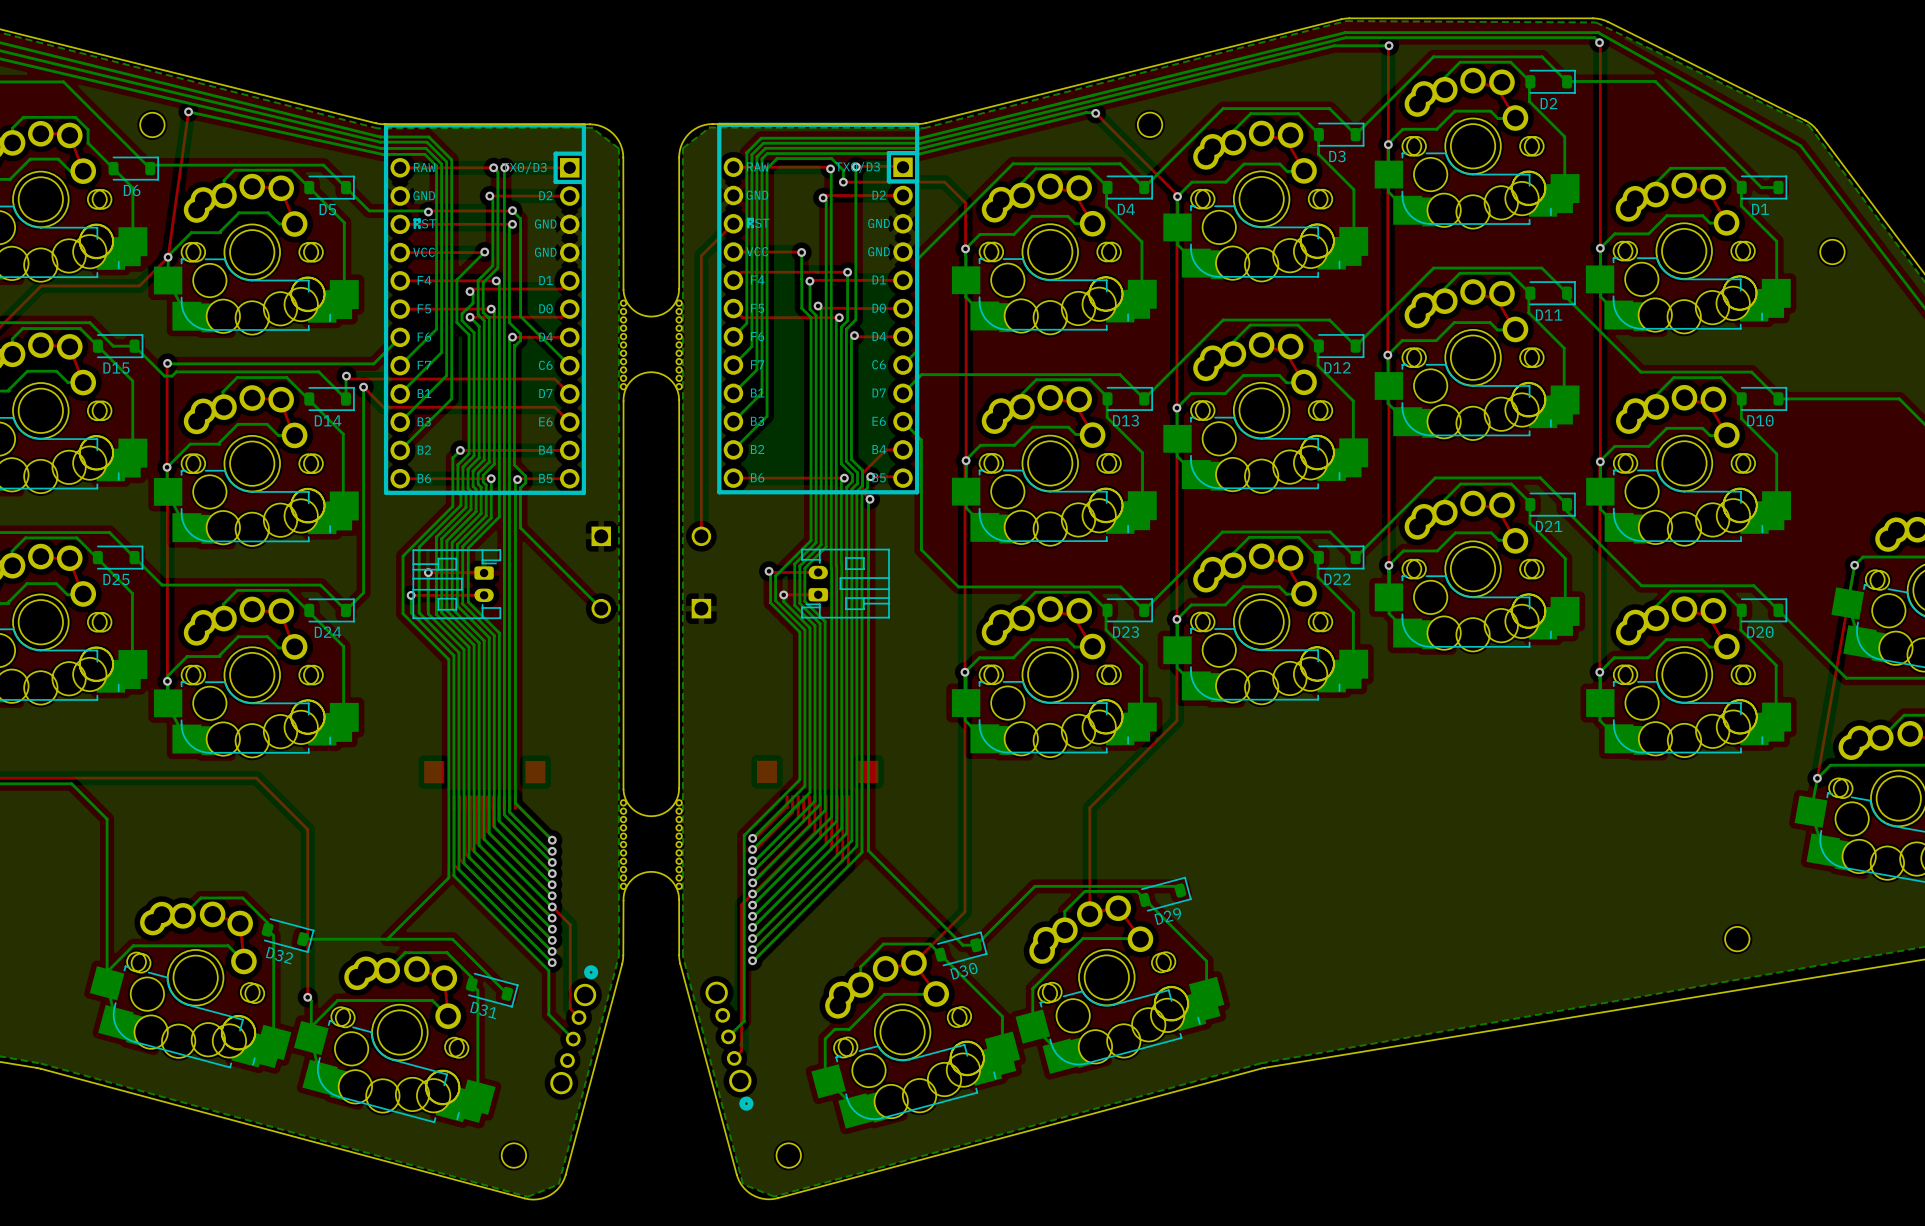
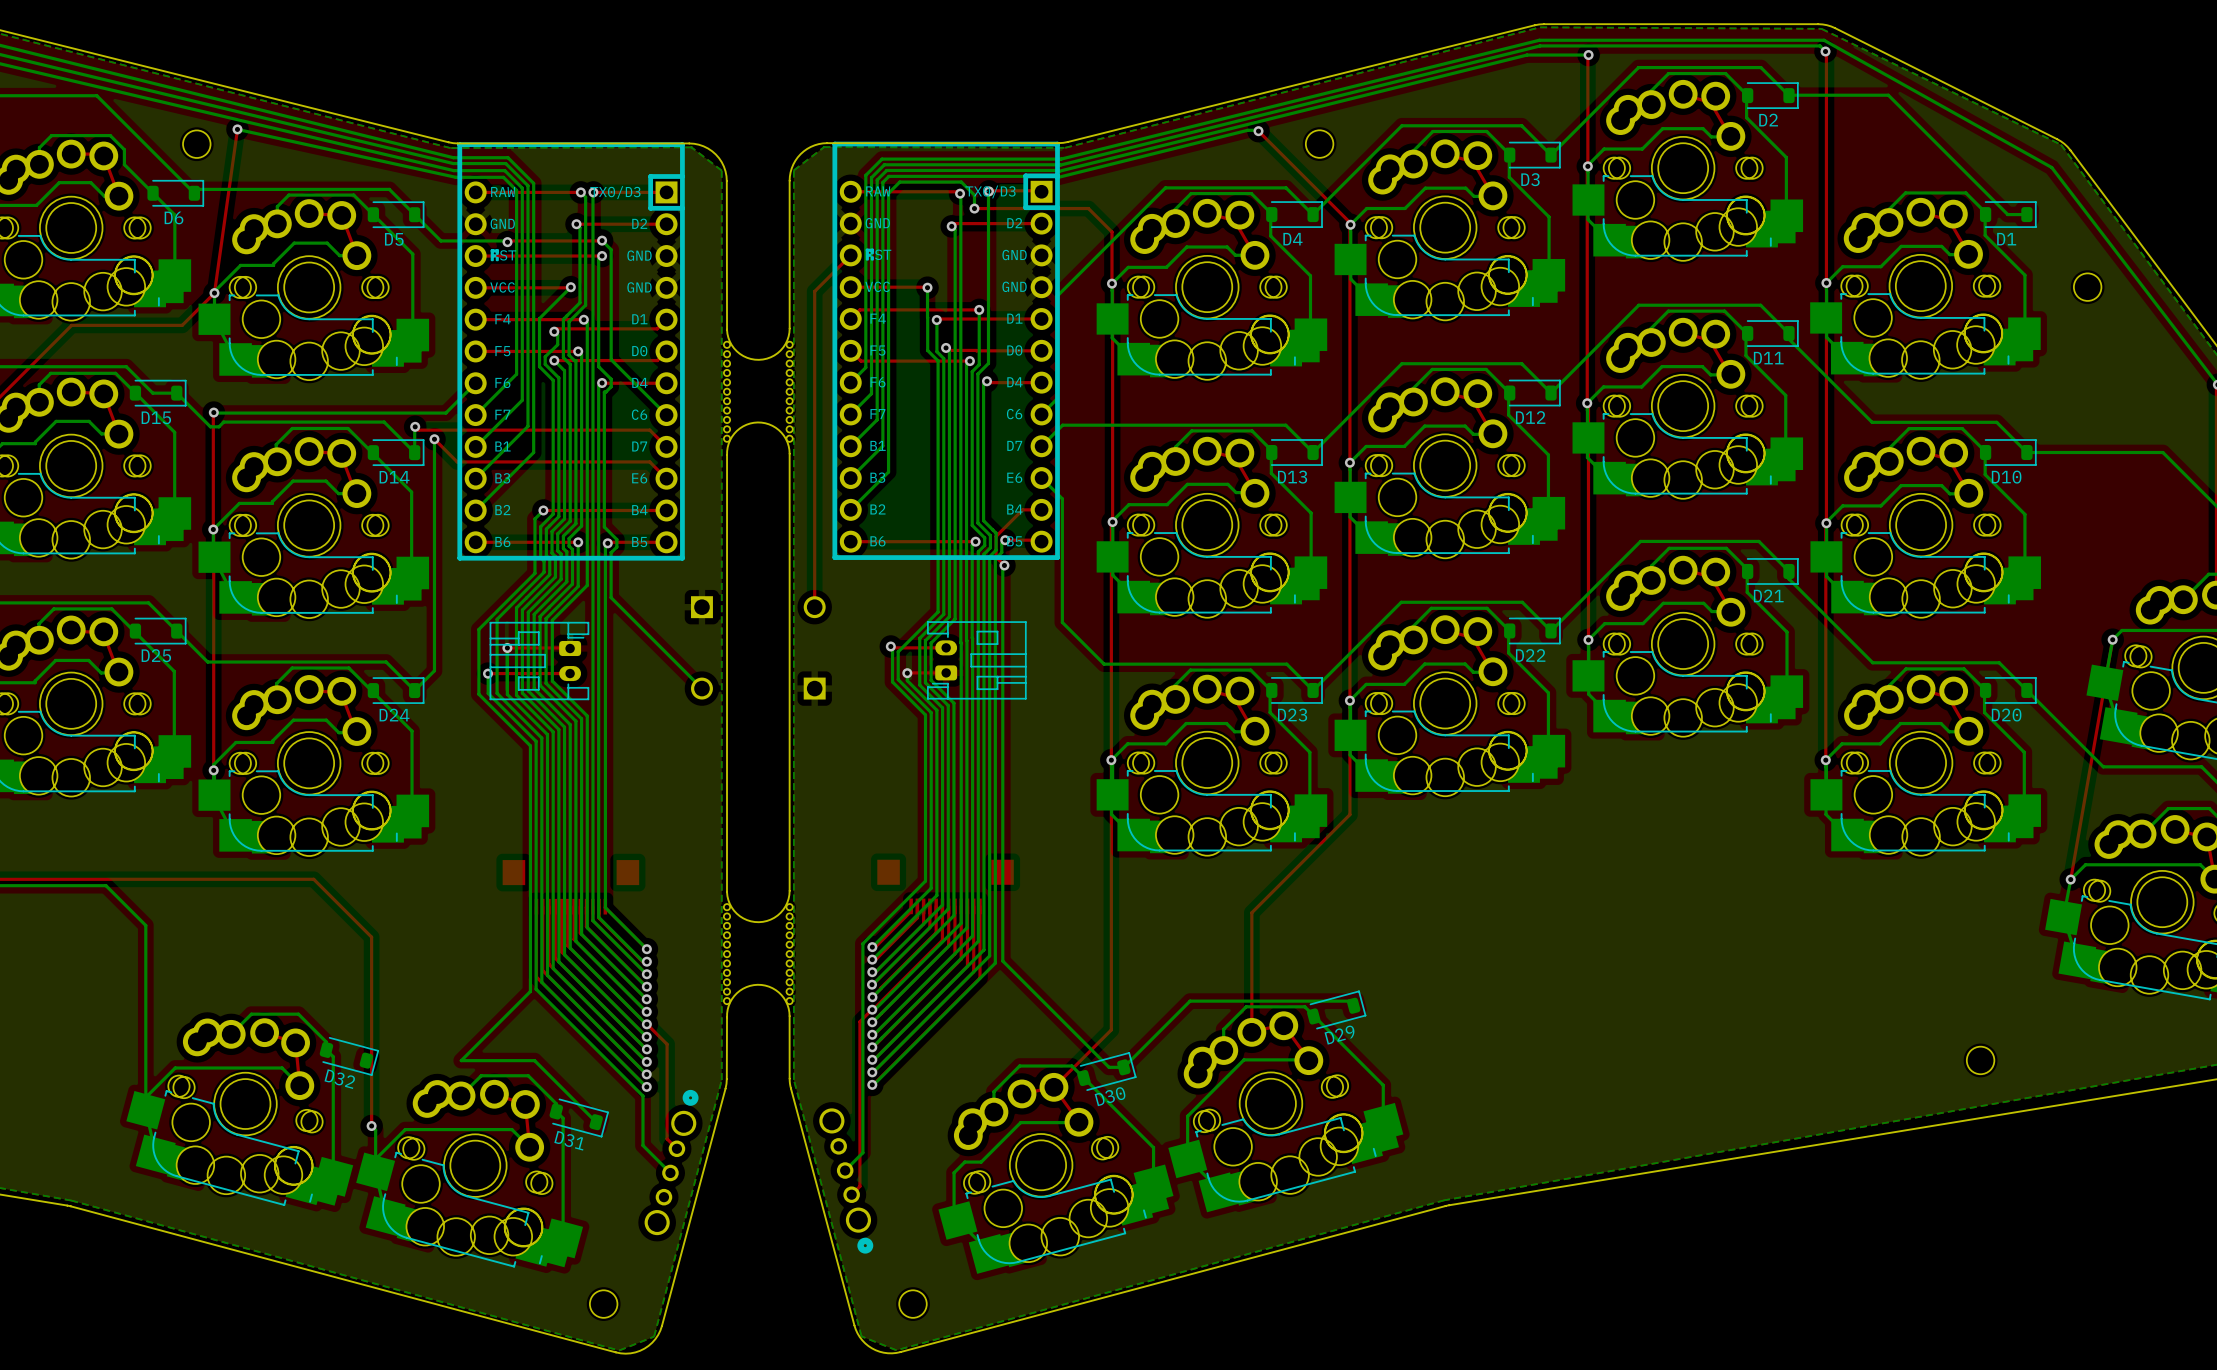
bottom track: (303, 938) (387, 939) -> none

